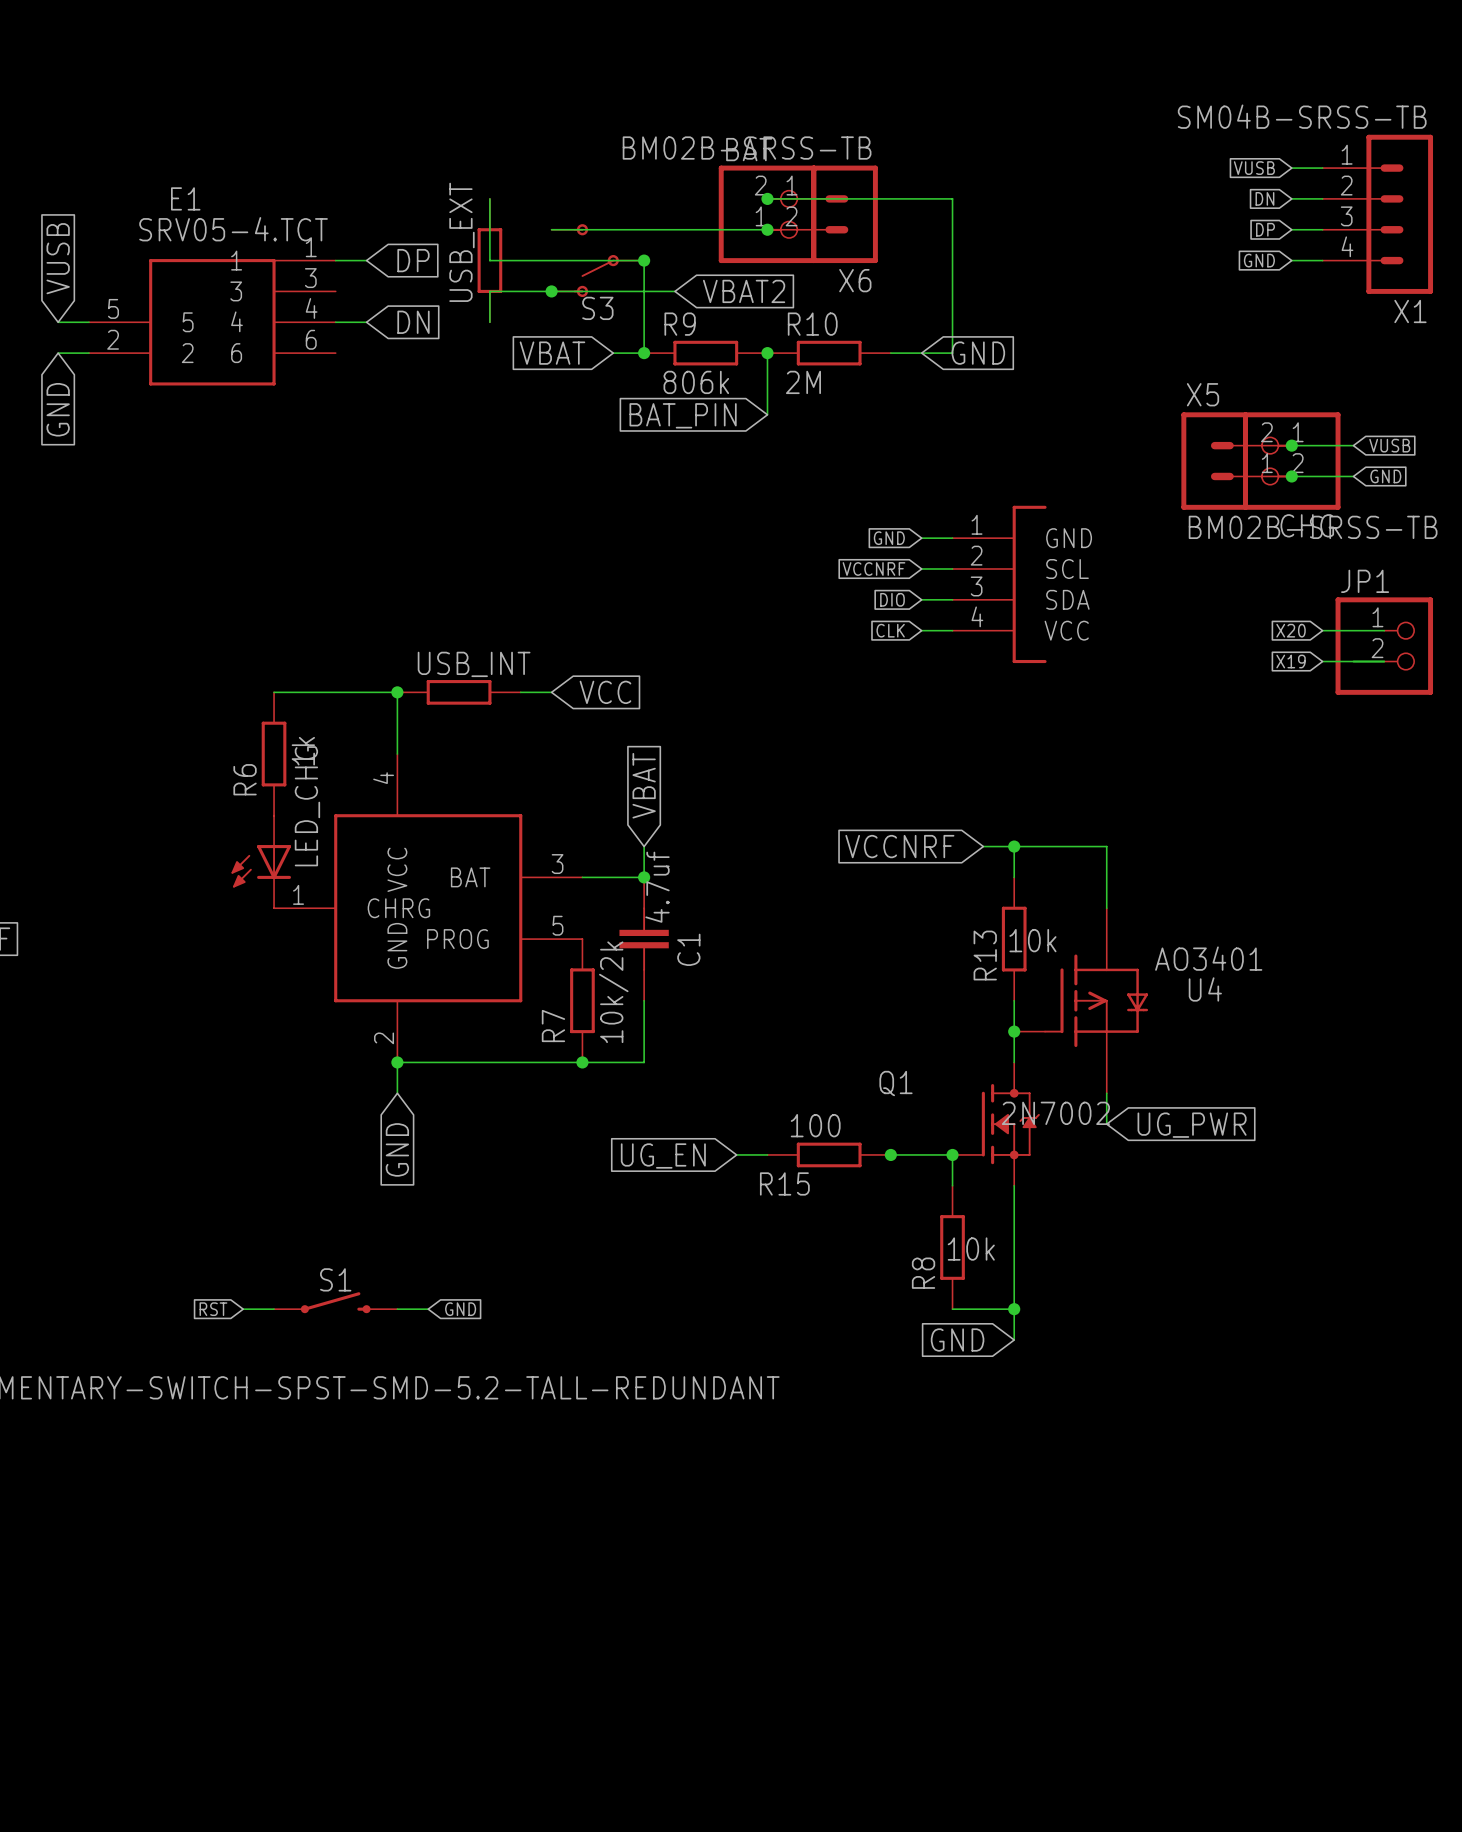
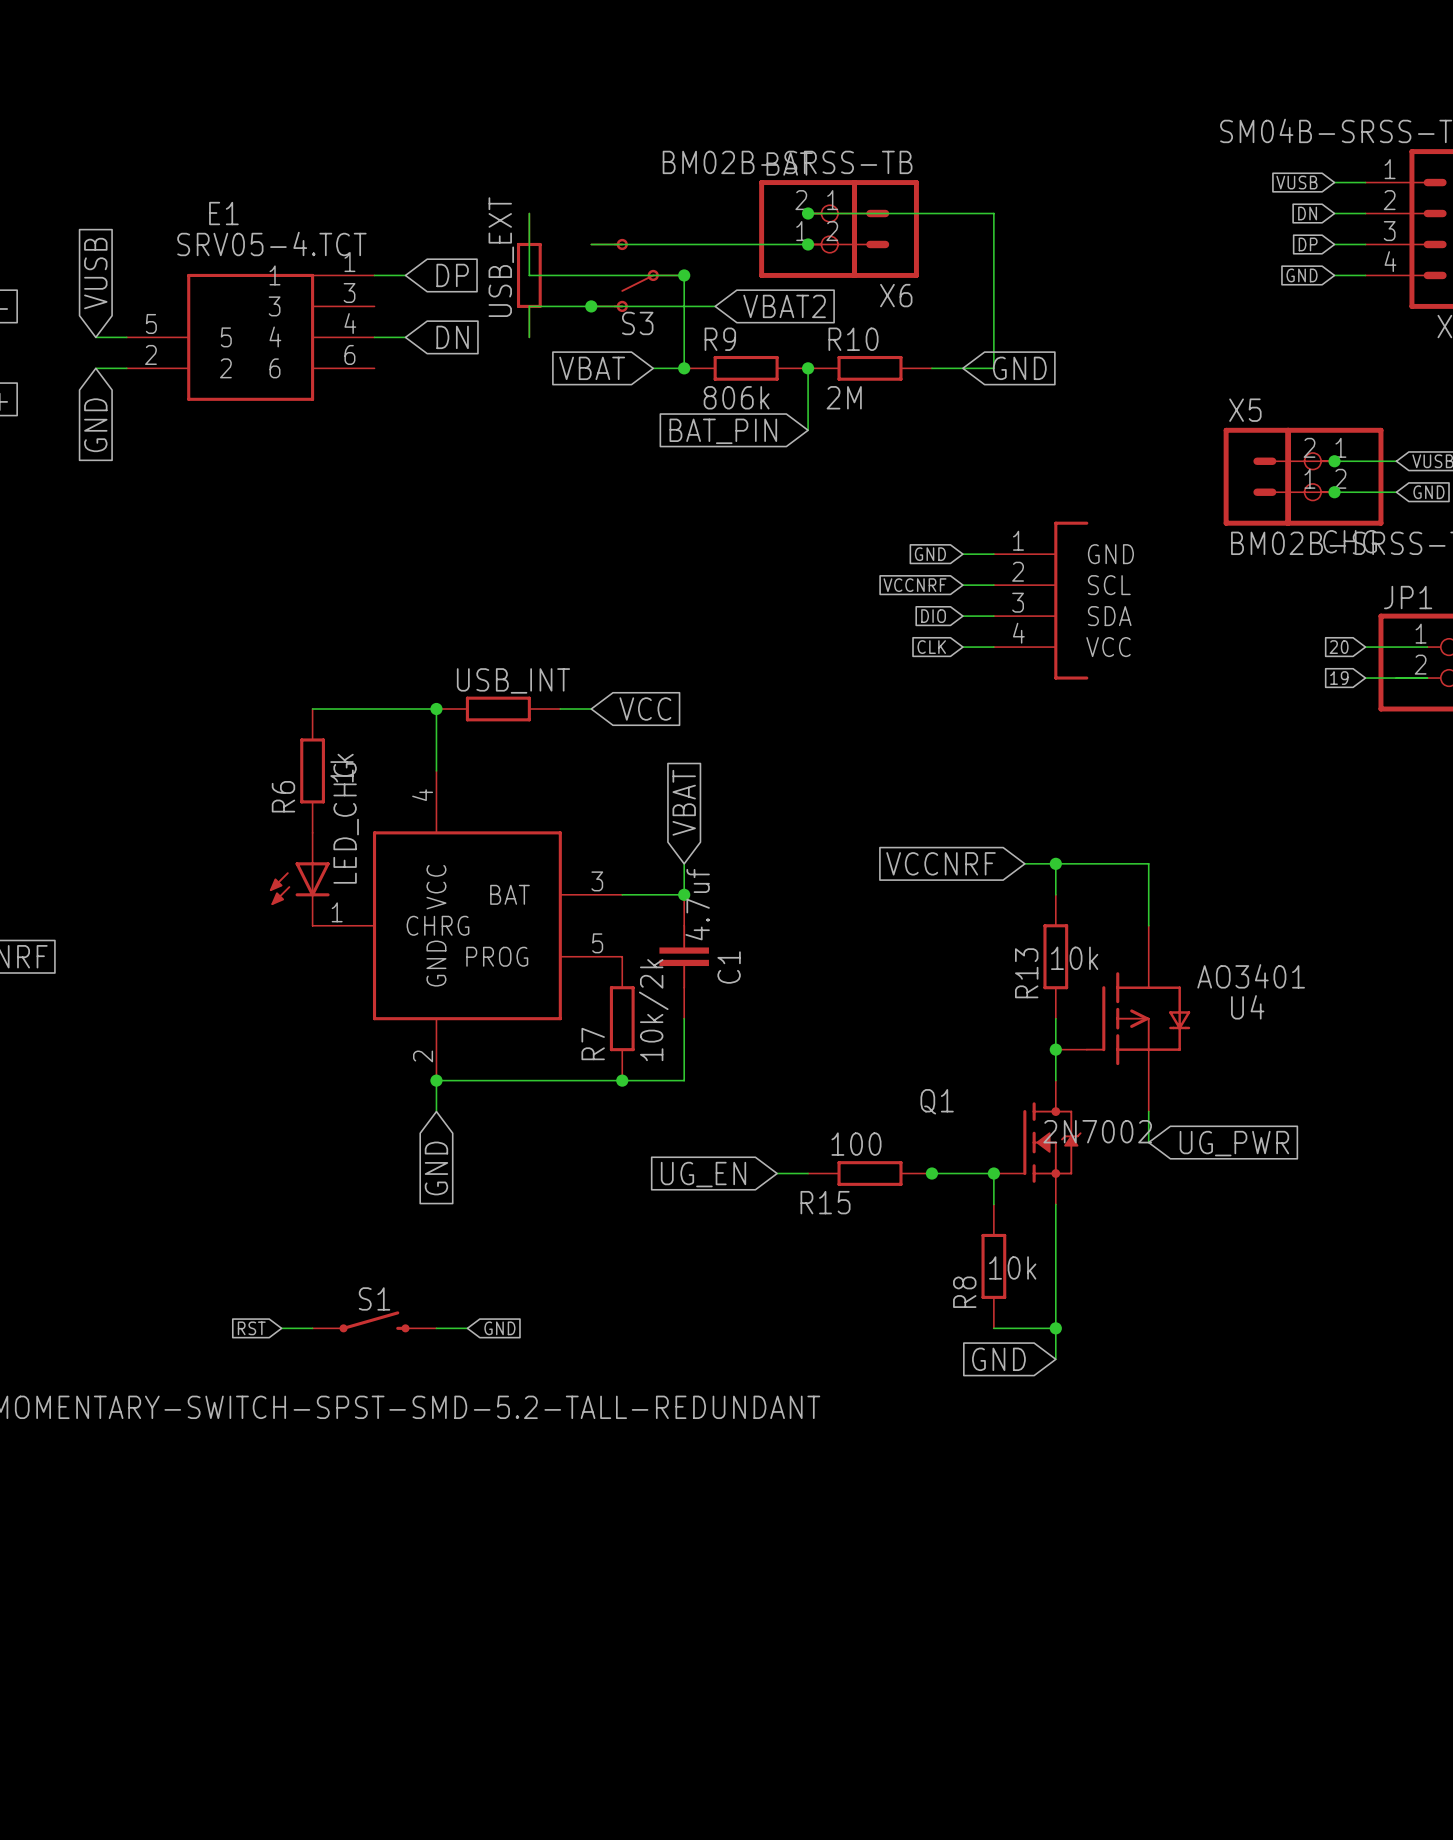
global label: X20 (1291, 630) -> 20 (1339, 647)
global label: X19 (1291, 661) -> 19 (1339, 678)

